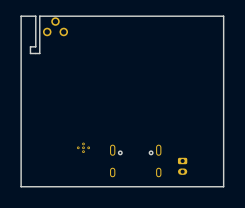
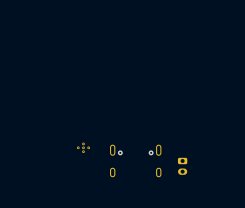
board edge: (223, 16) (39, 16) (39, 53) (30, 53) (30, 46) (35, 46) (35, 16) (21, 16) (21, 186) (223, 186) (223, 16) -> none
part: (55, 26) -> none

